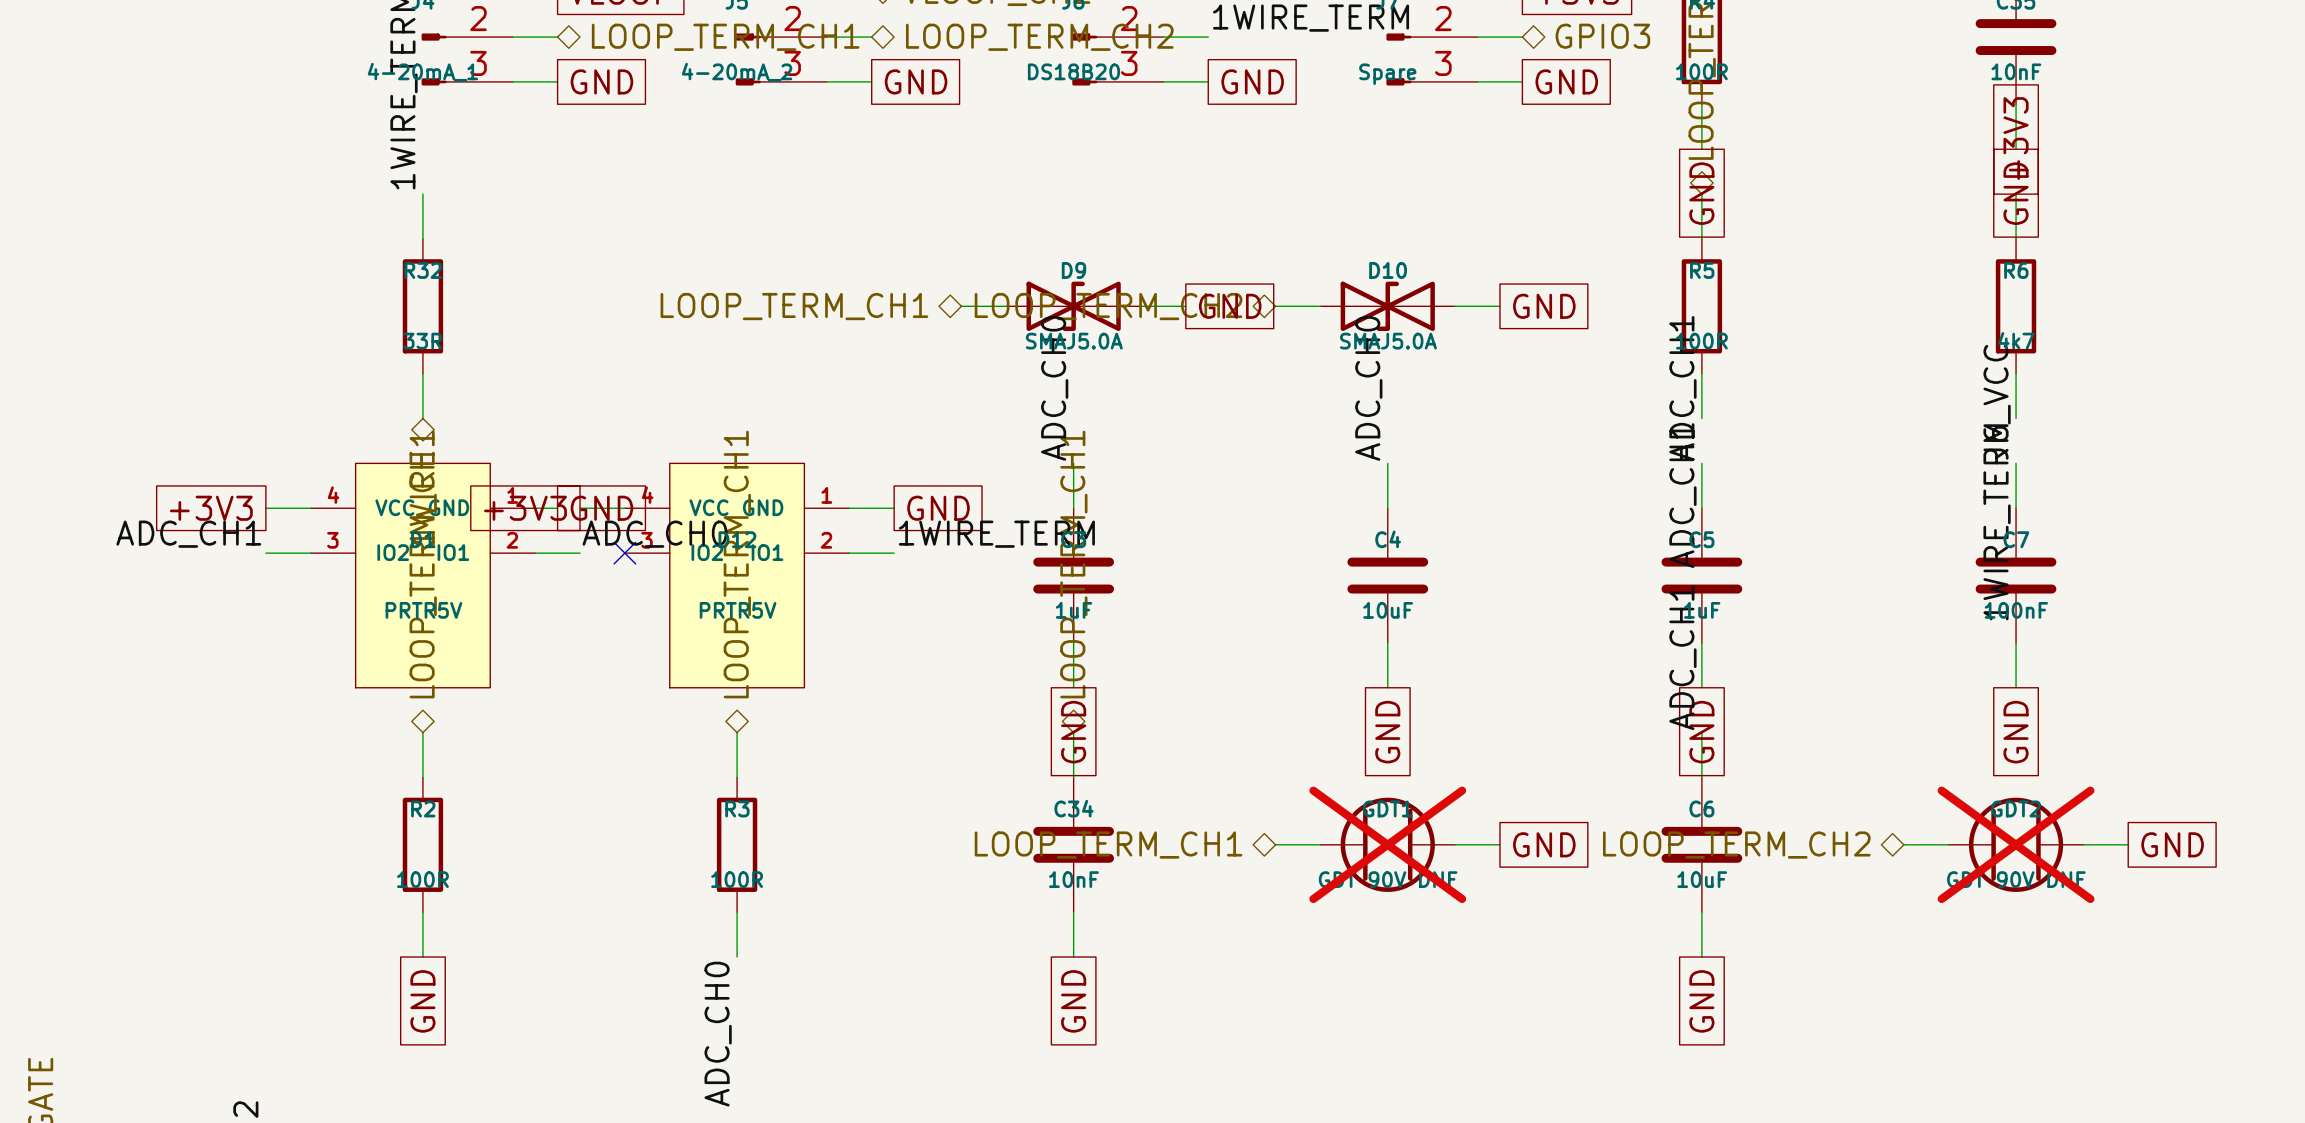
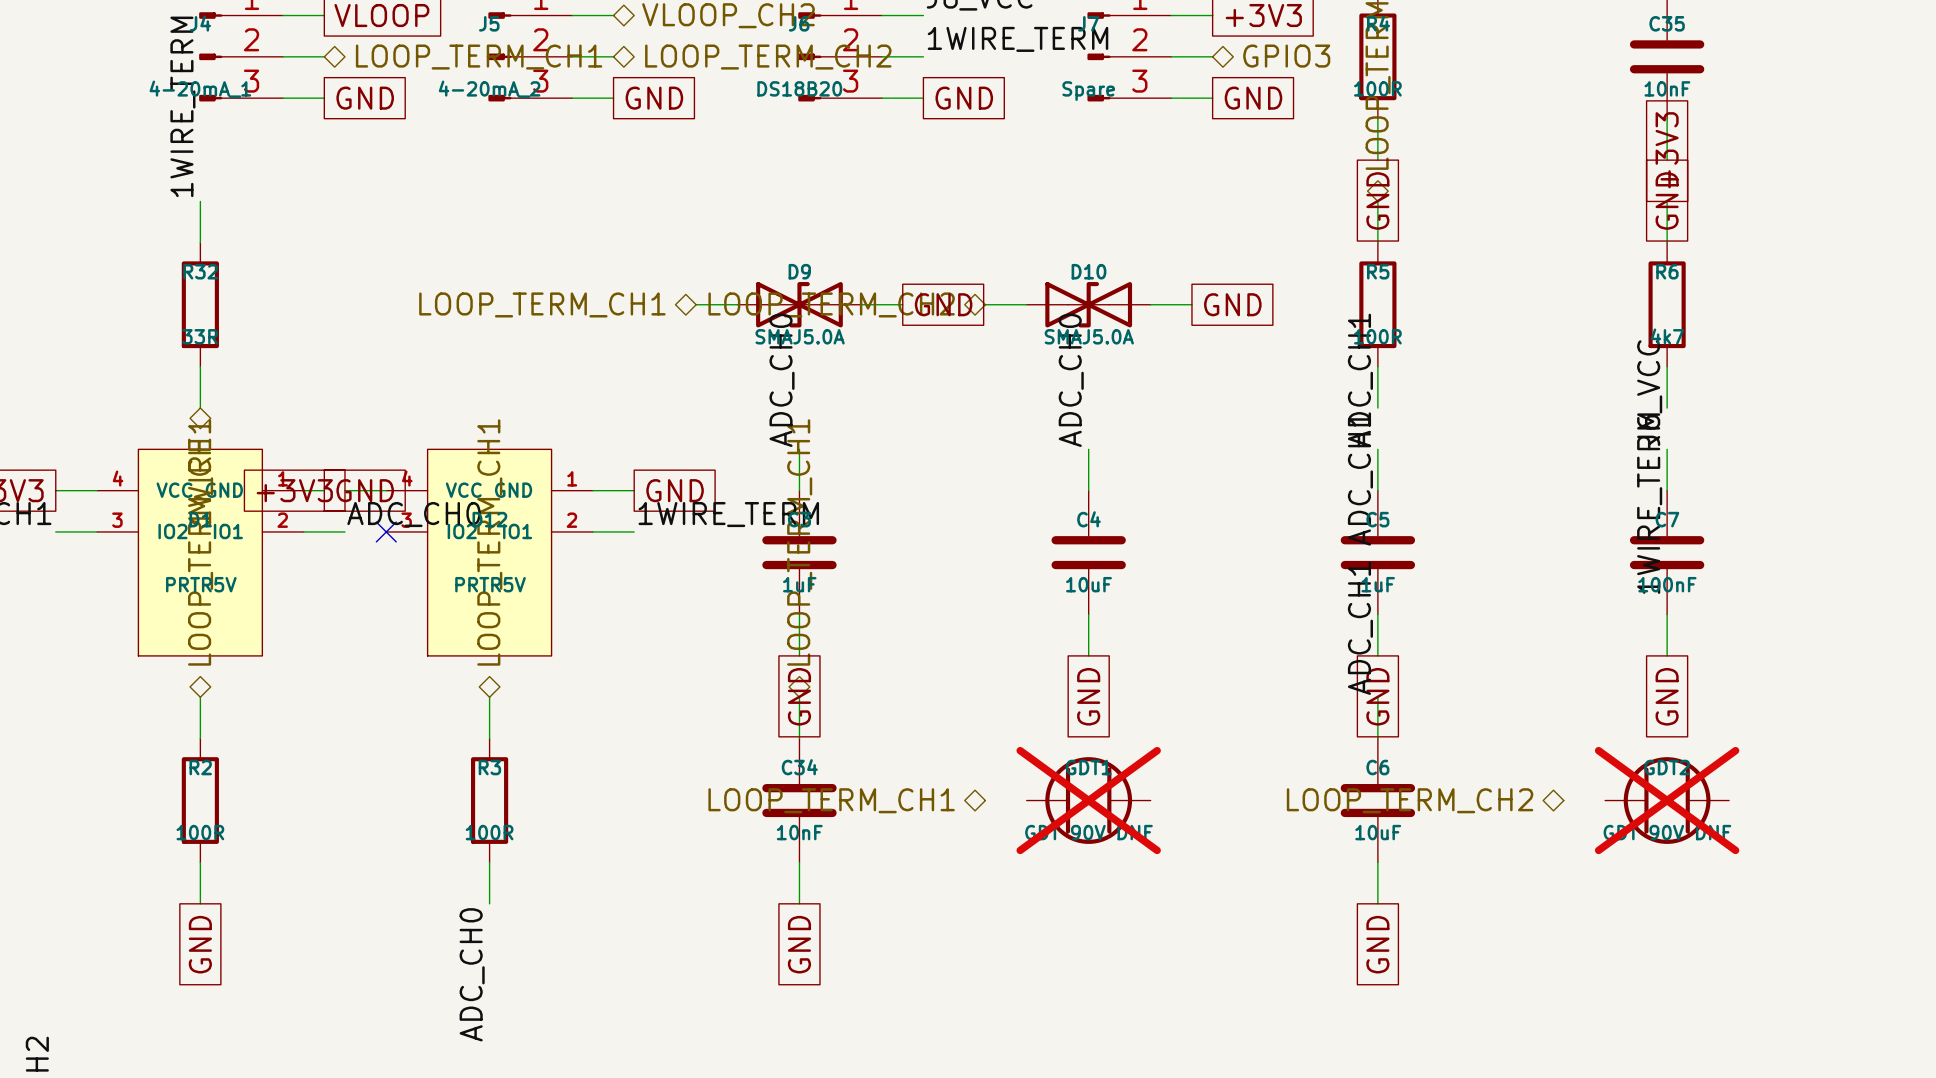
wire: (1275, 844) (1320, 844) -> none
wire: (1455, 844) (1499, 844) -> none
global label: GND (1544, 844) -> none
wire: (1903, 844) (1948, 844) -> none
wire: (2083, 844) (2128, 844) -> none
global label: GND (2172, 844) -> none

